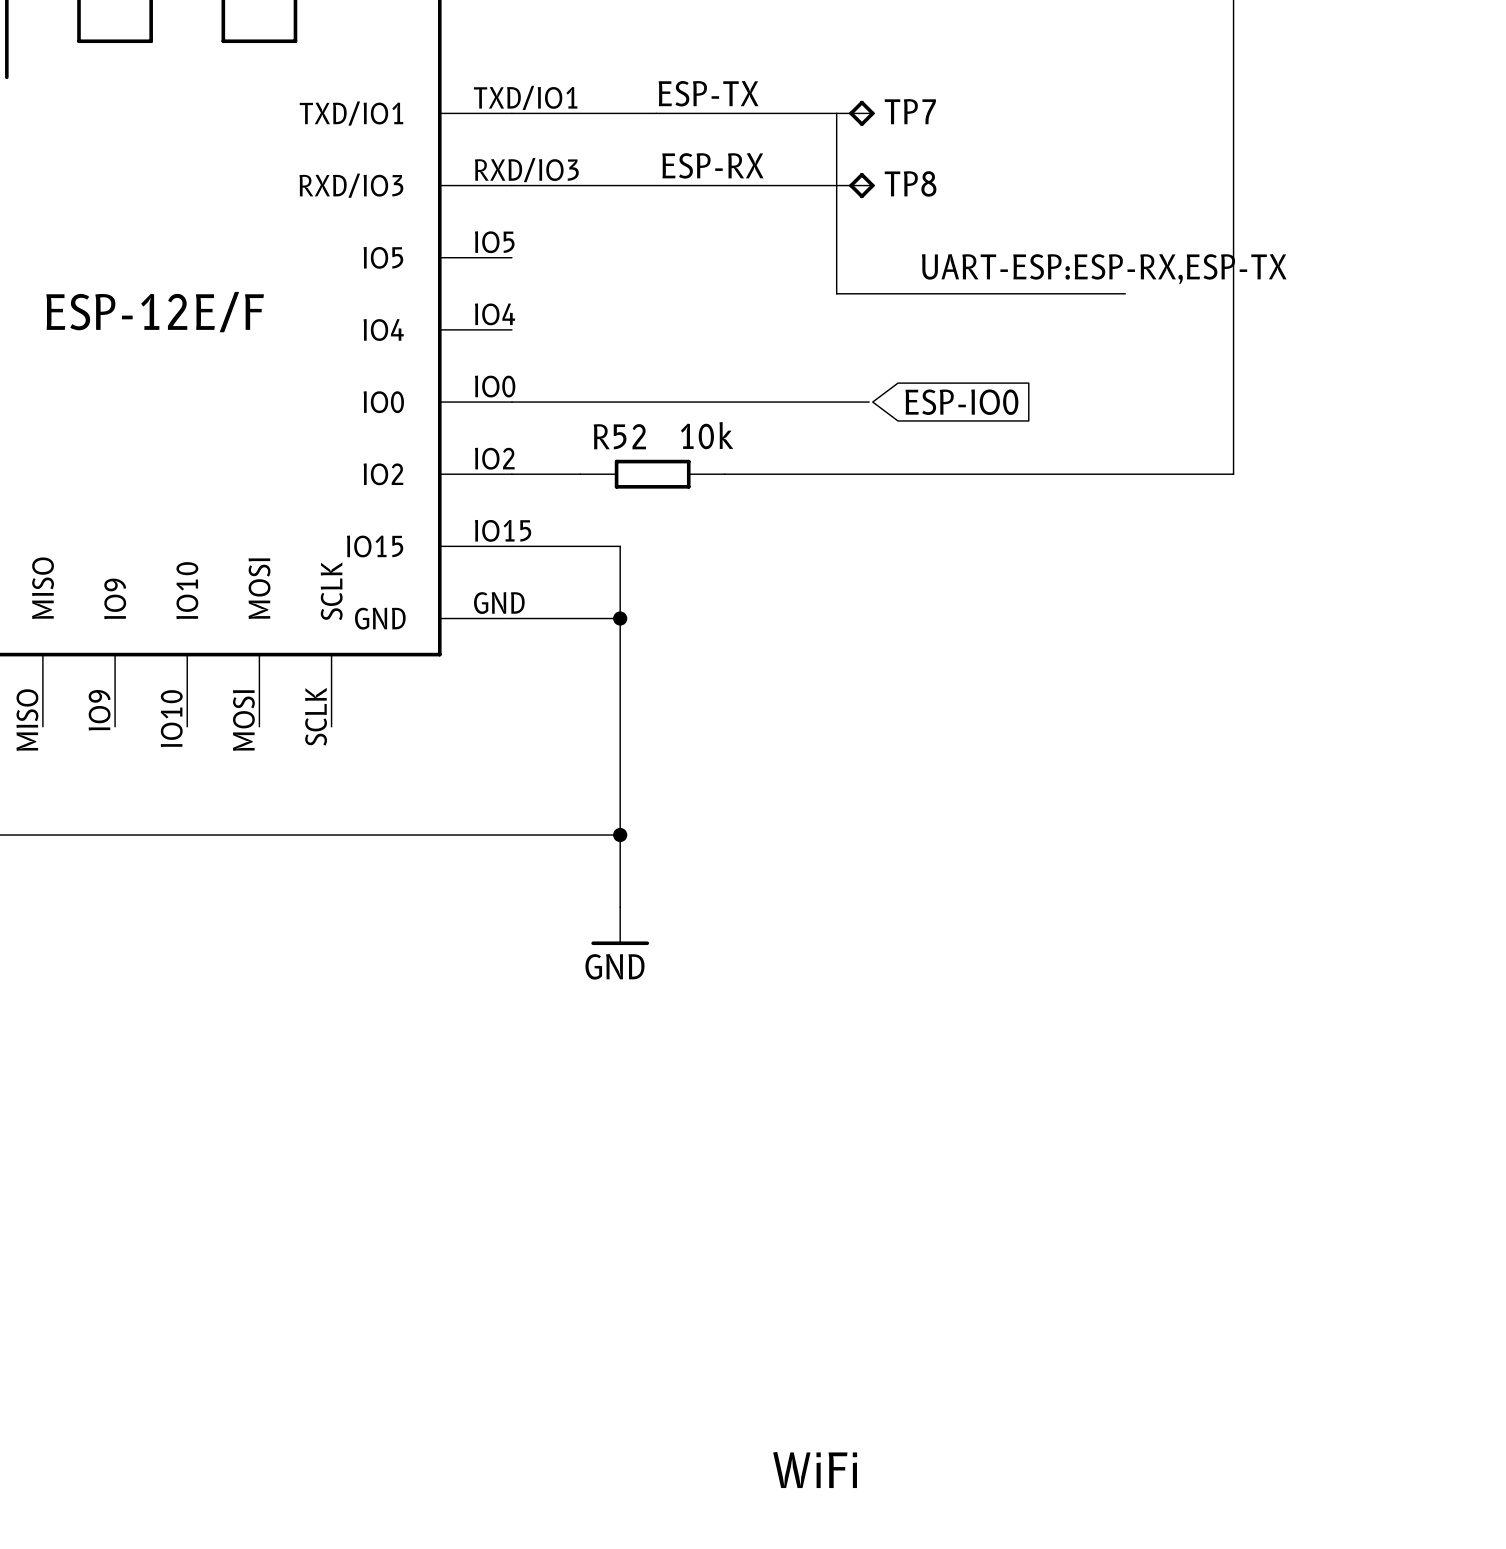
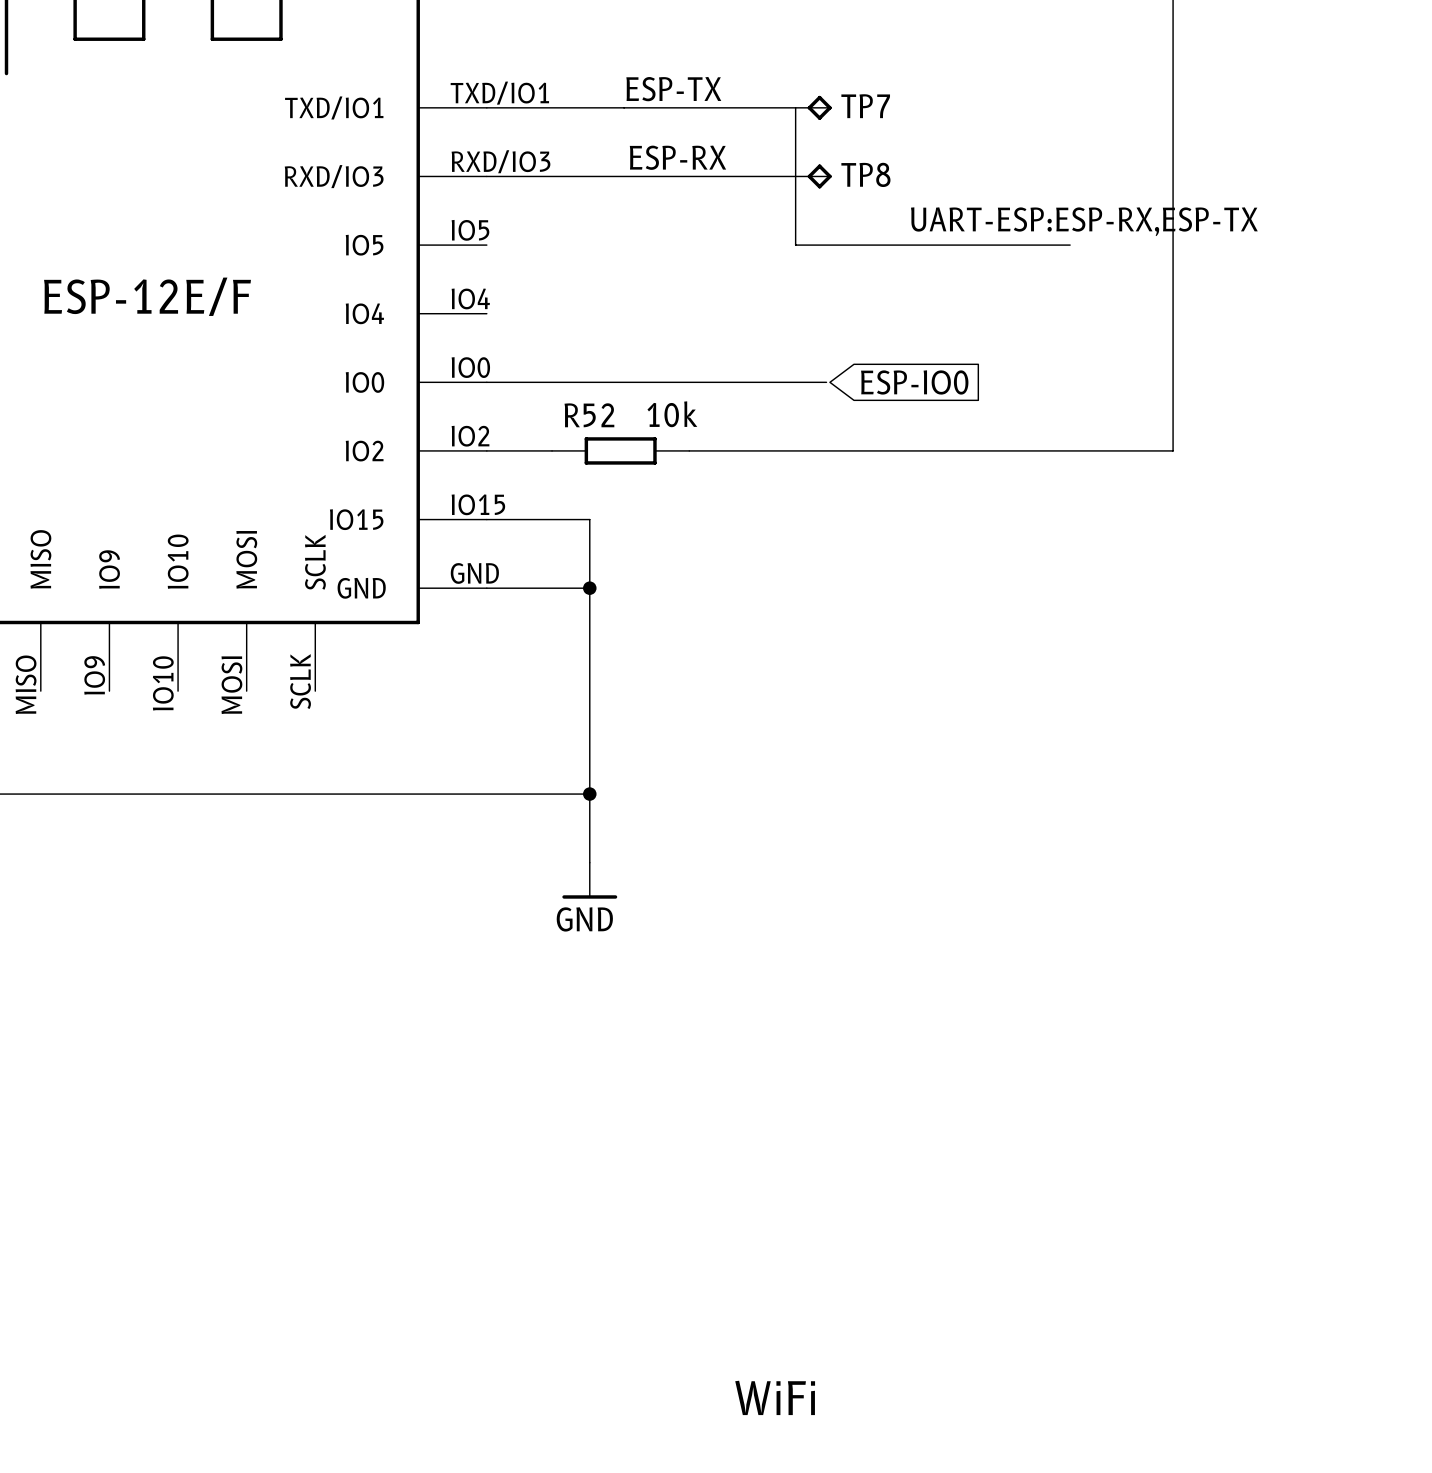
bus: (836, 257) (836, 293) (1125, 293) -> (795, 245) (1070, 245)
label position: UART-ESP:ESP-RX,ESP-TX (1104, 269) -> UART-ESP:ESP-RX,ESP-TX (1084, 221)

